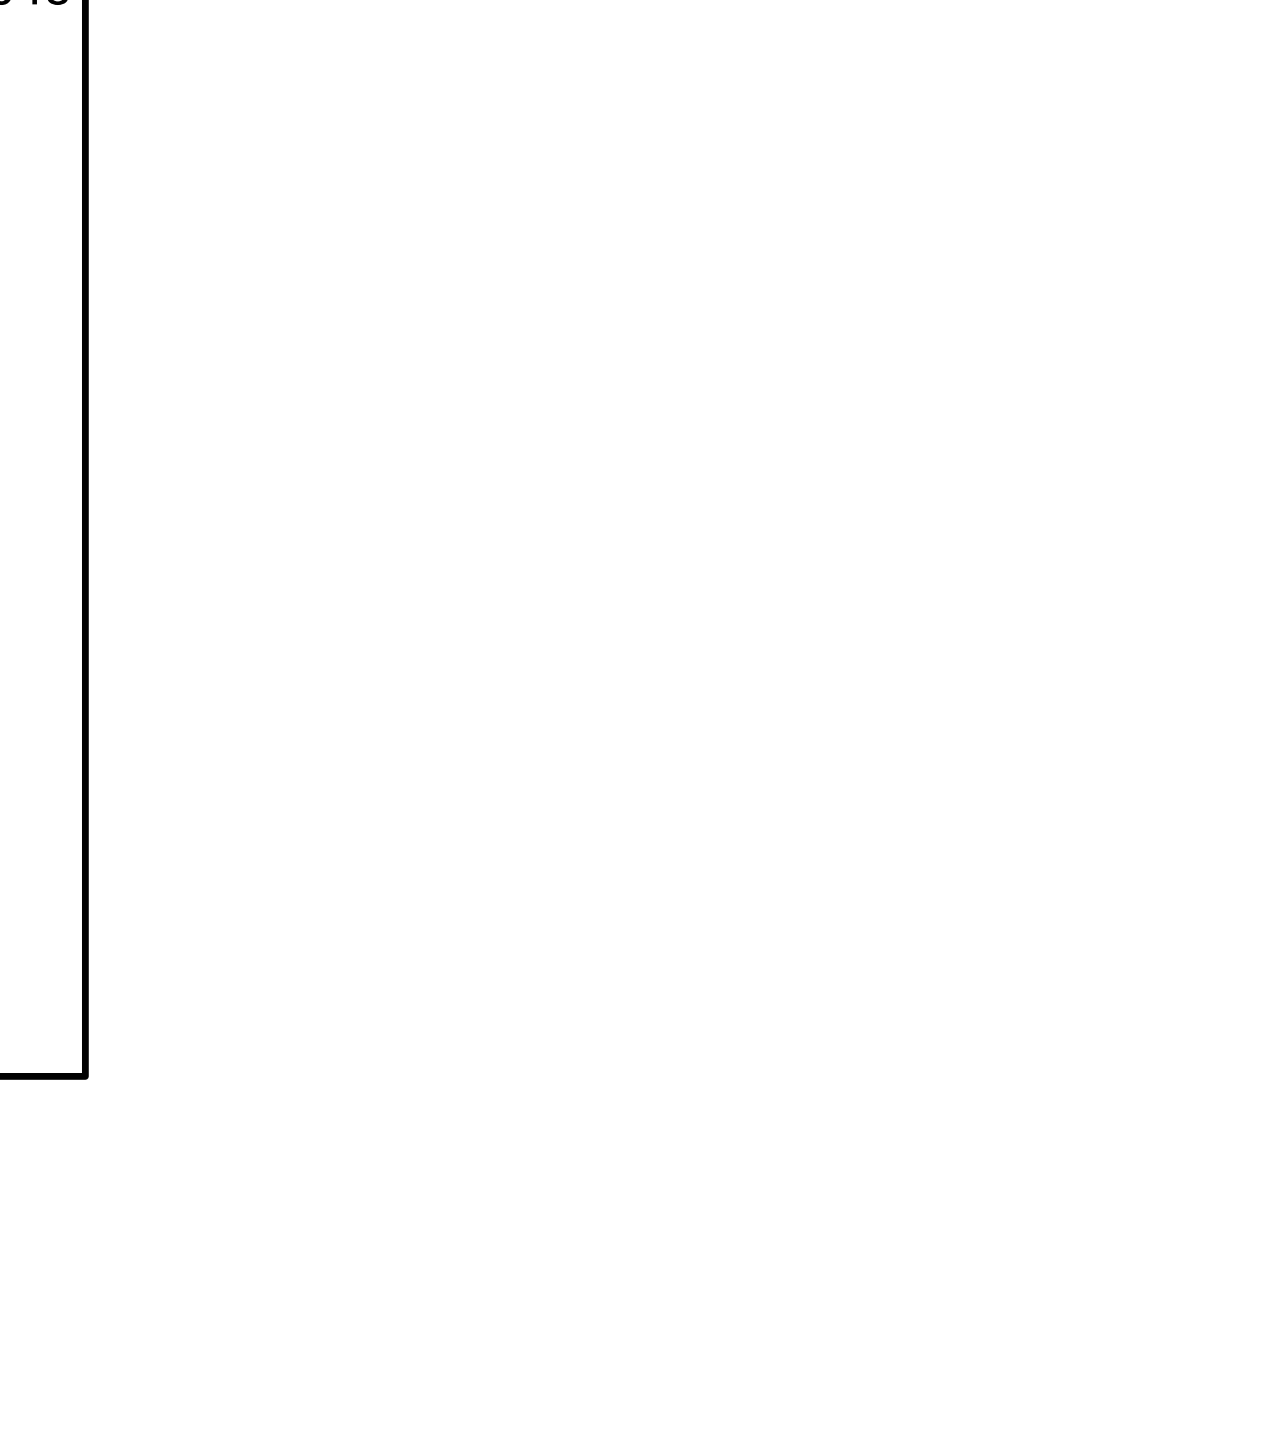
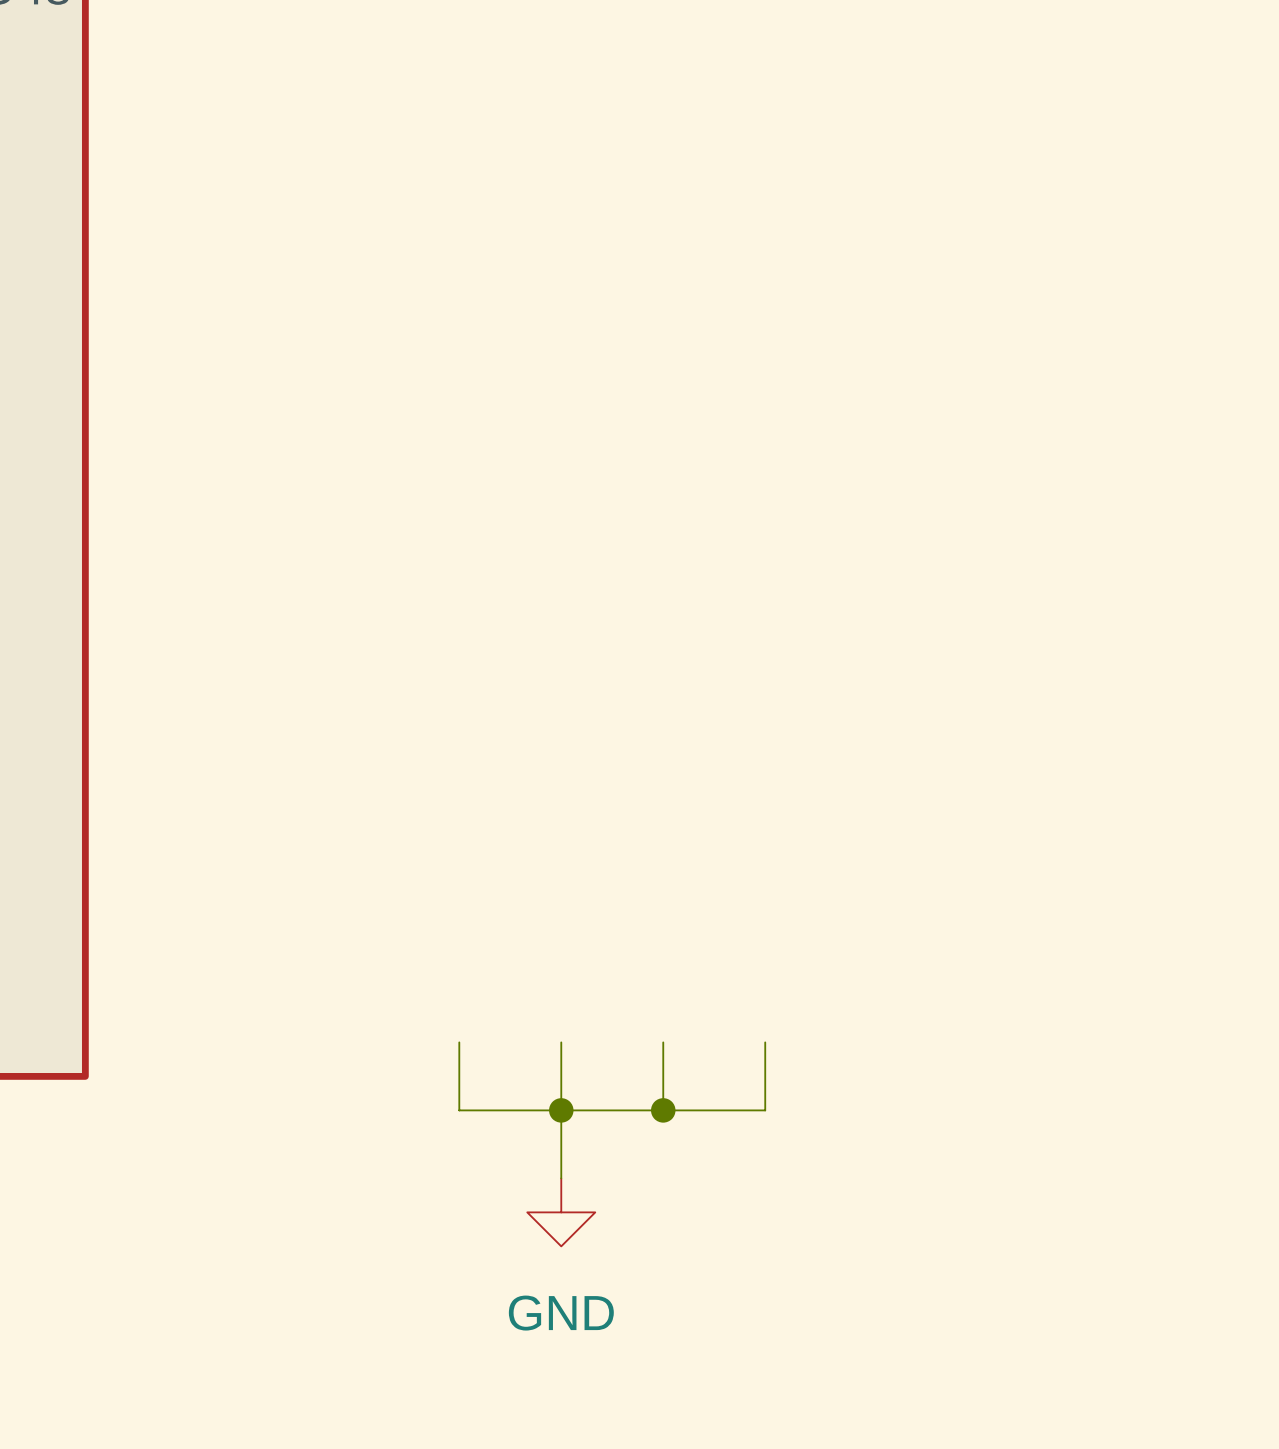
wire: none -> (459, 1042) (459, 1110) (765, 1110) (765, 1042)
wire: none -> (561, 1042) (561, 1178)
wire: none -> (663, 1042) (663, 1110)
junction: none -> (561, 1110)
junction: none -> (663, 1110)
power symbol: none -> GND (561, 1212)

